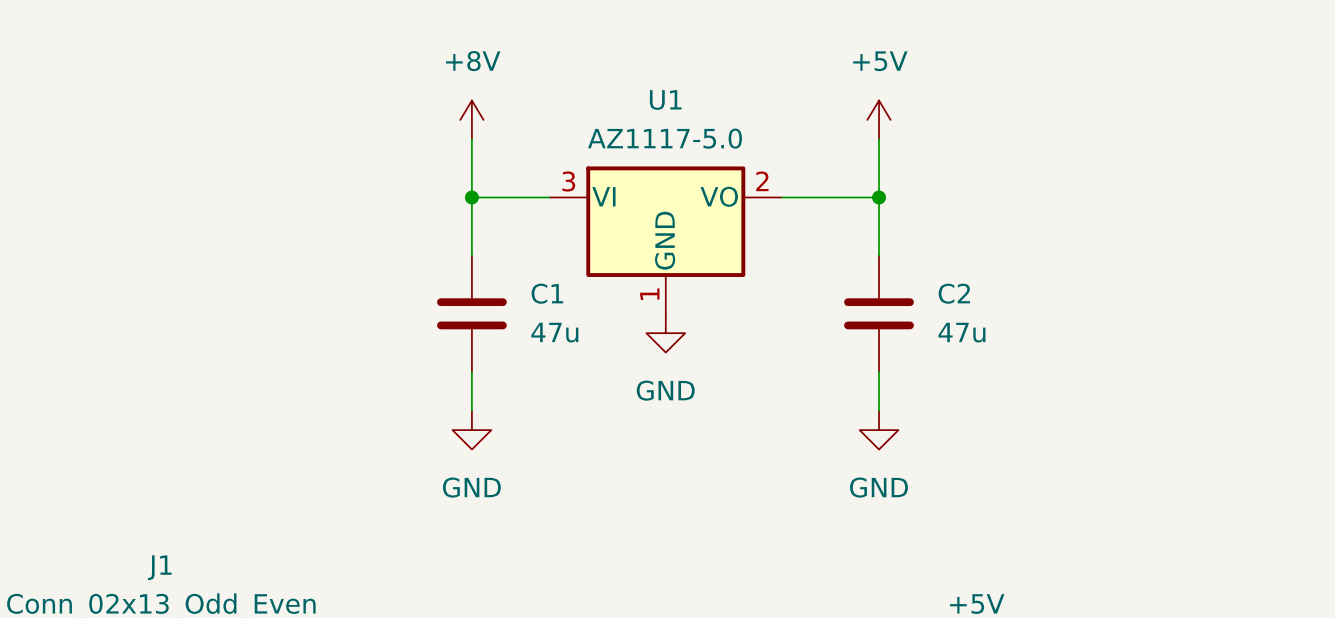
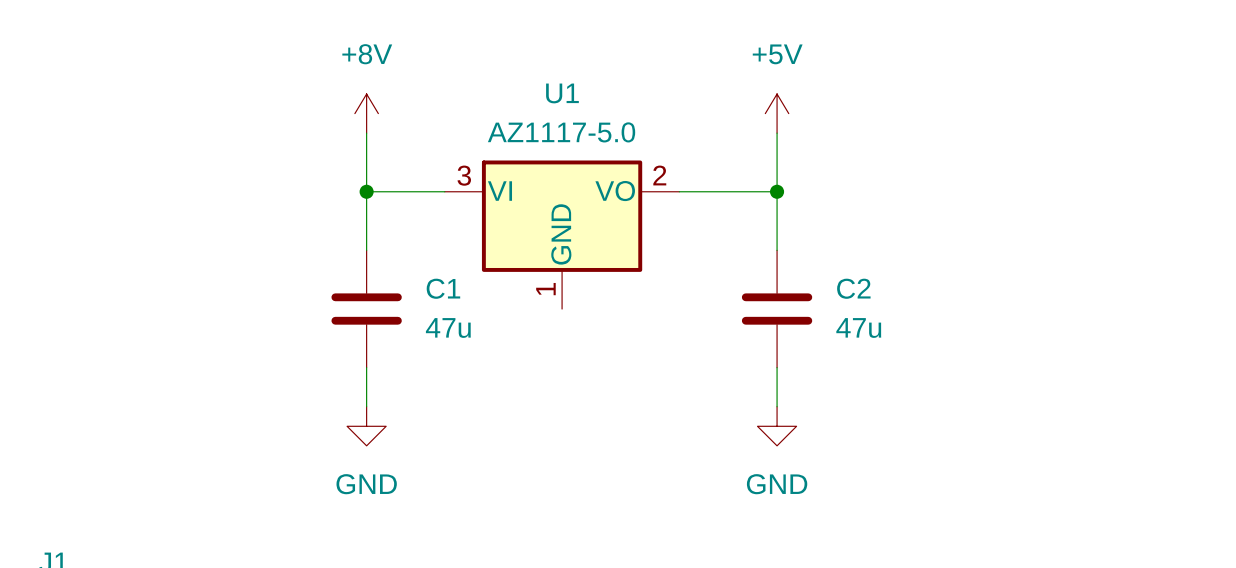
power symbol: GND (665, 333) -> none

